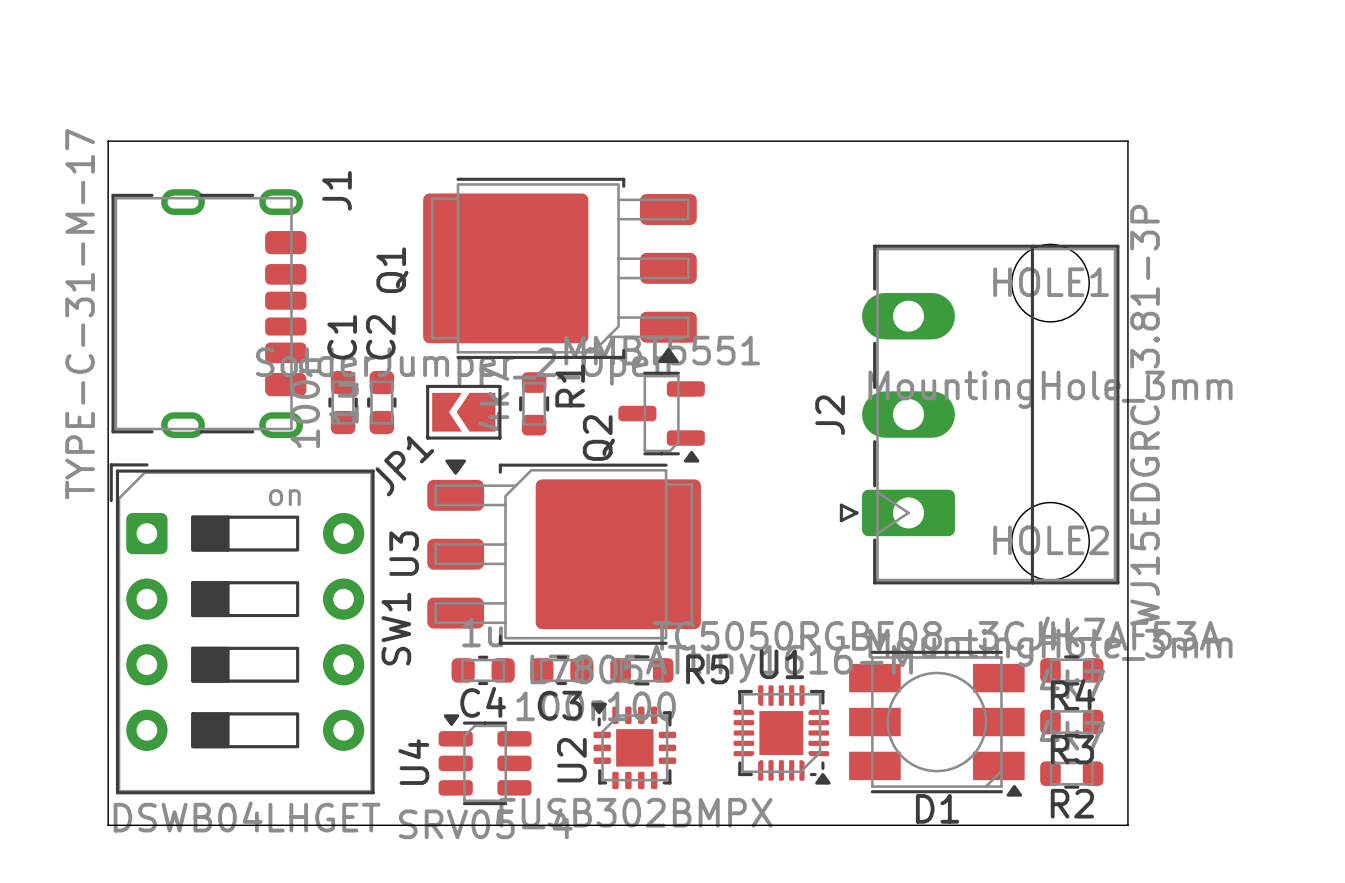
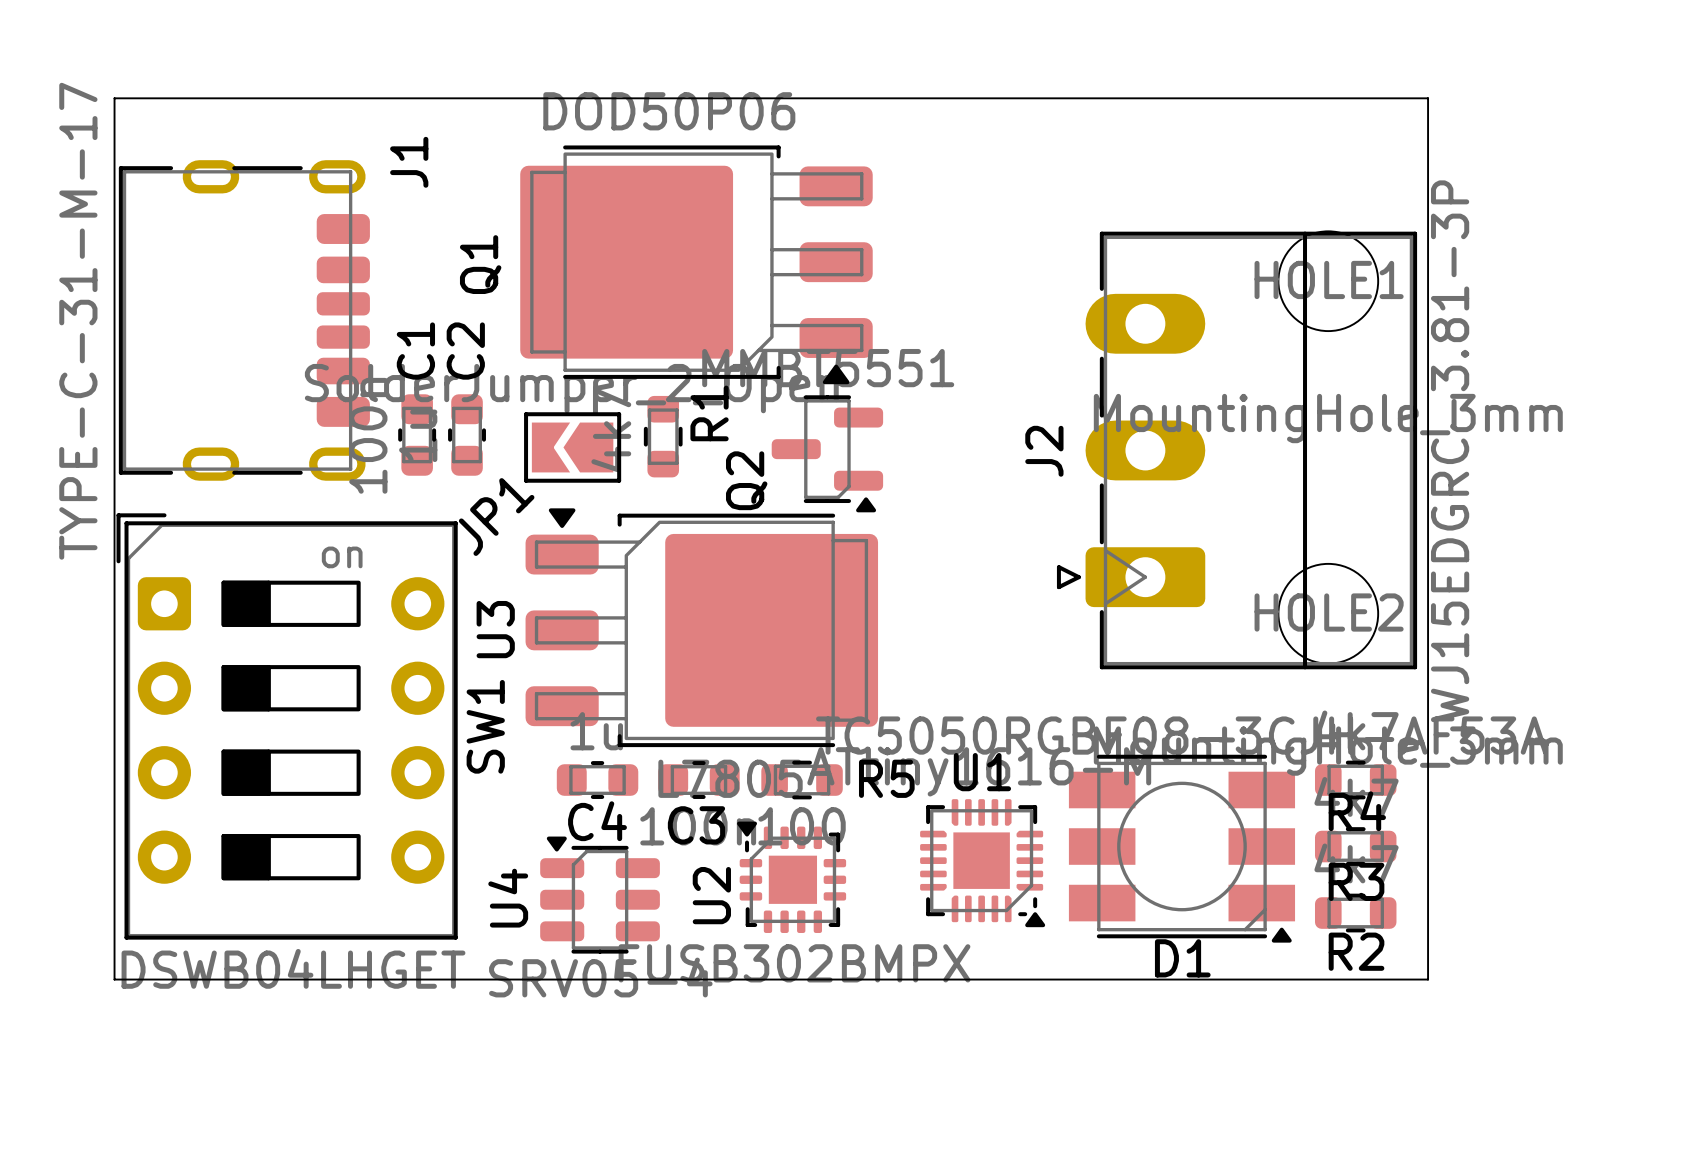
Q1 value: none -> DOD50P06 (669, 111)

